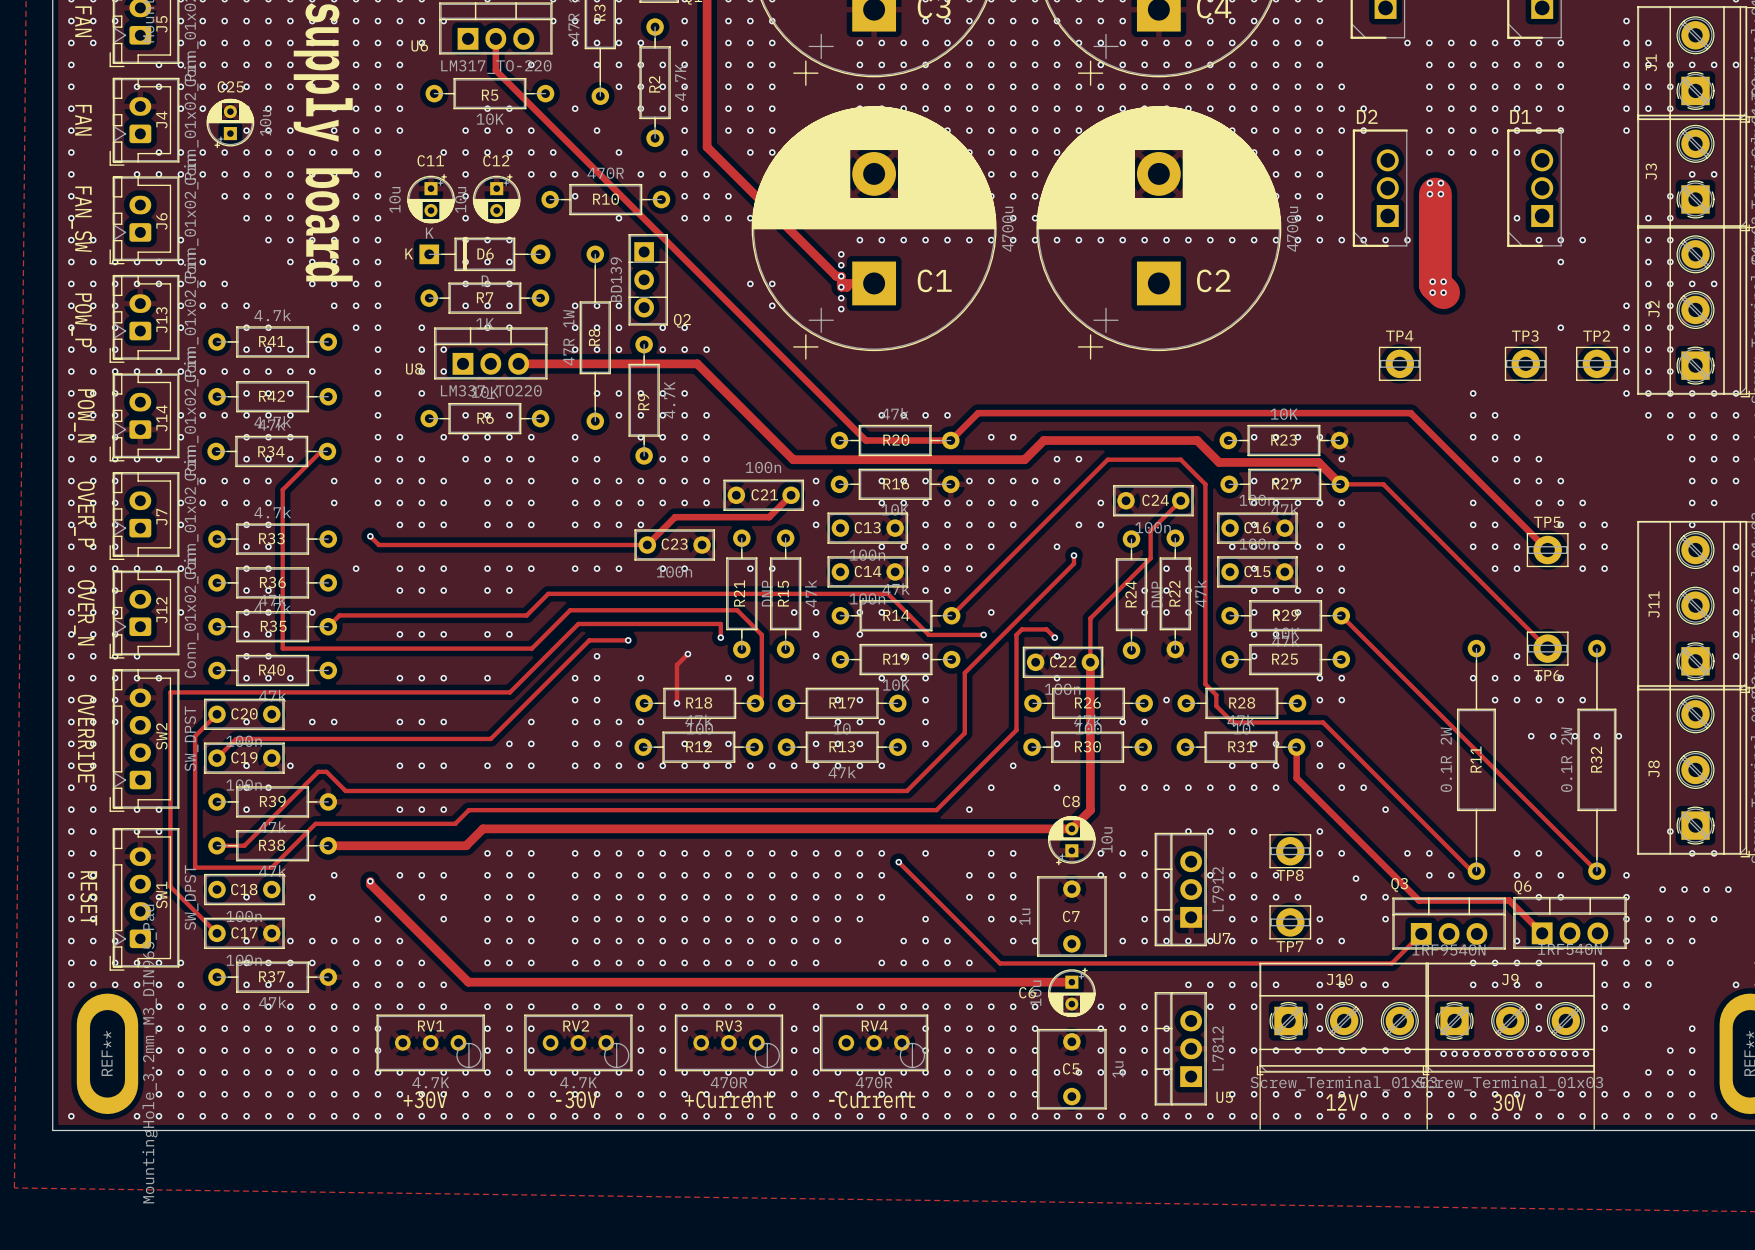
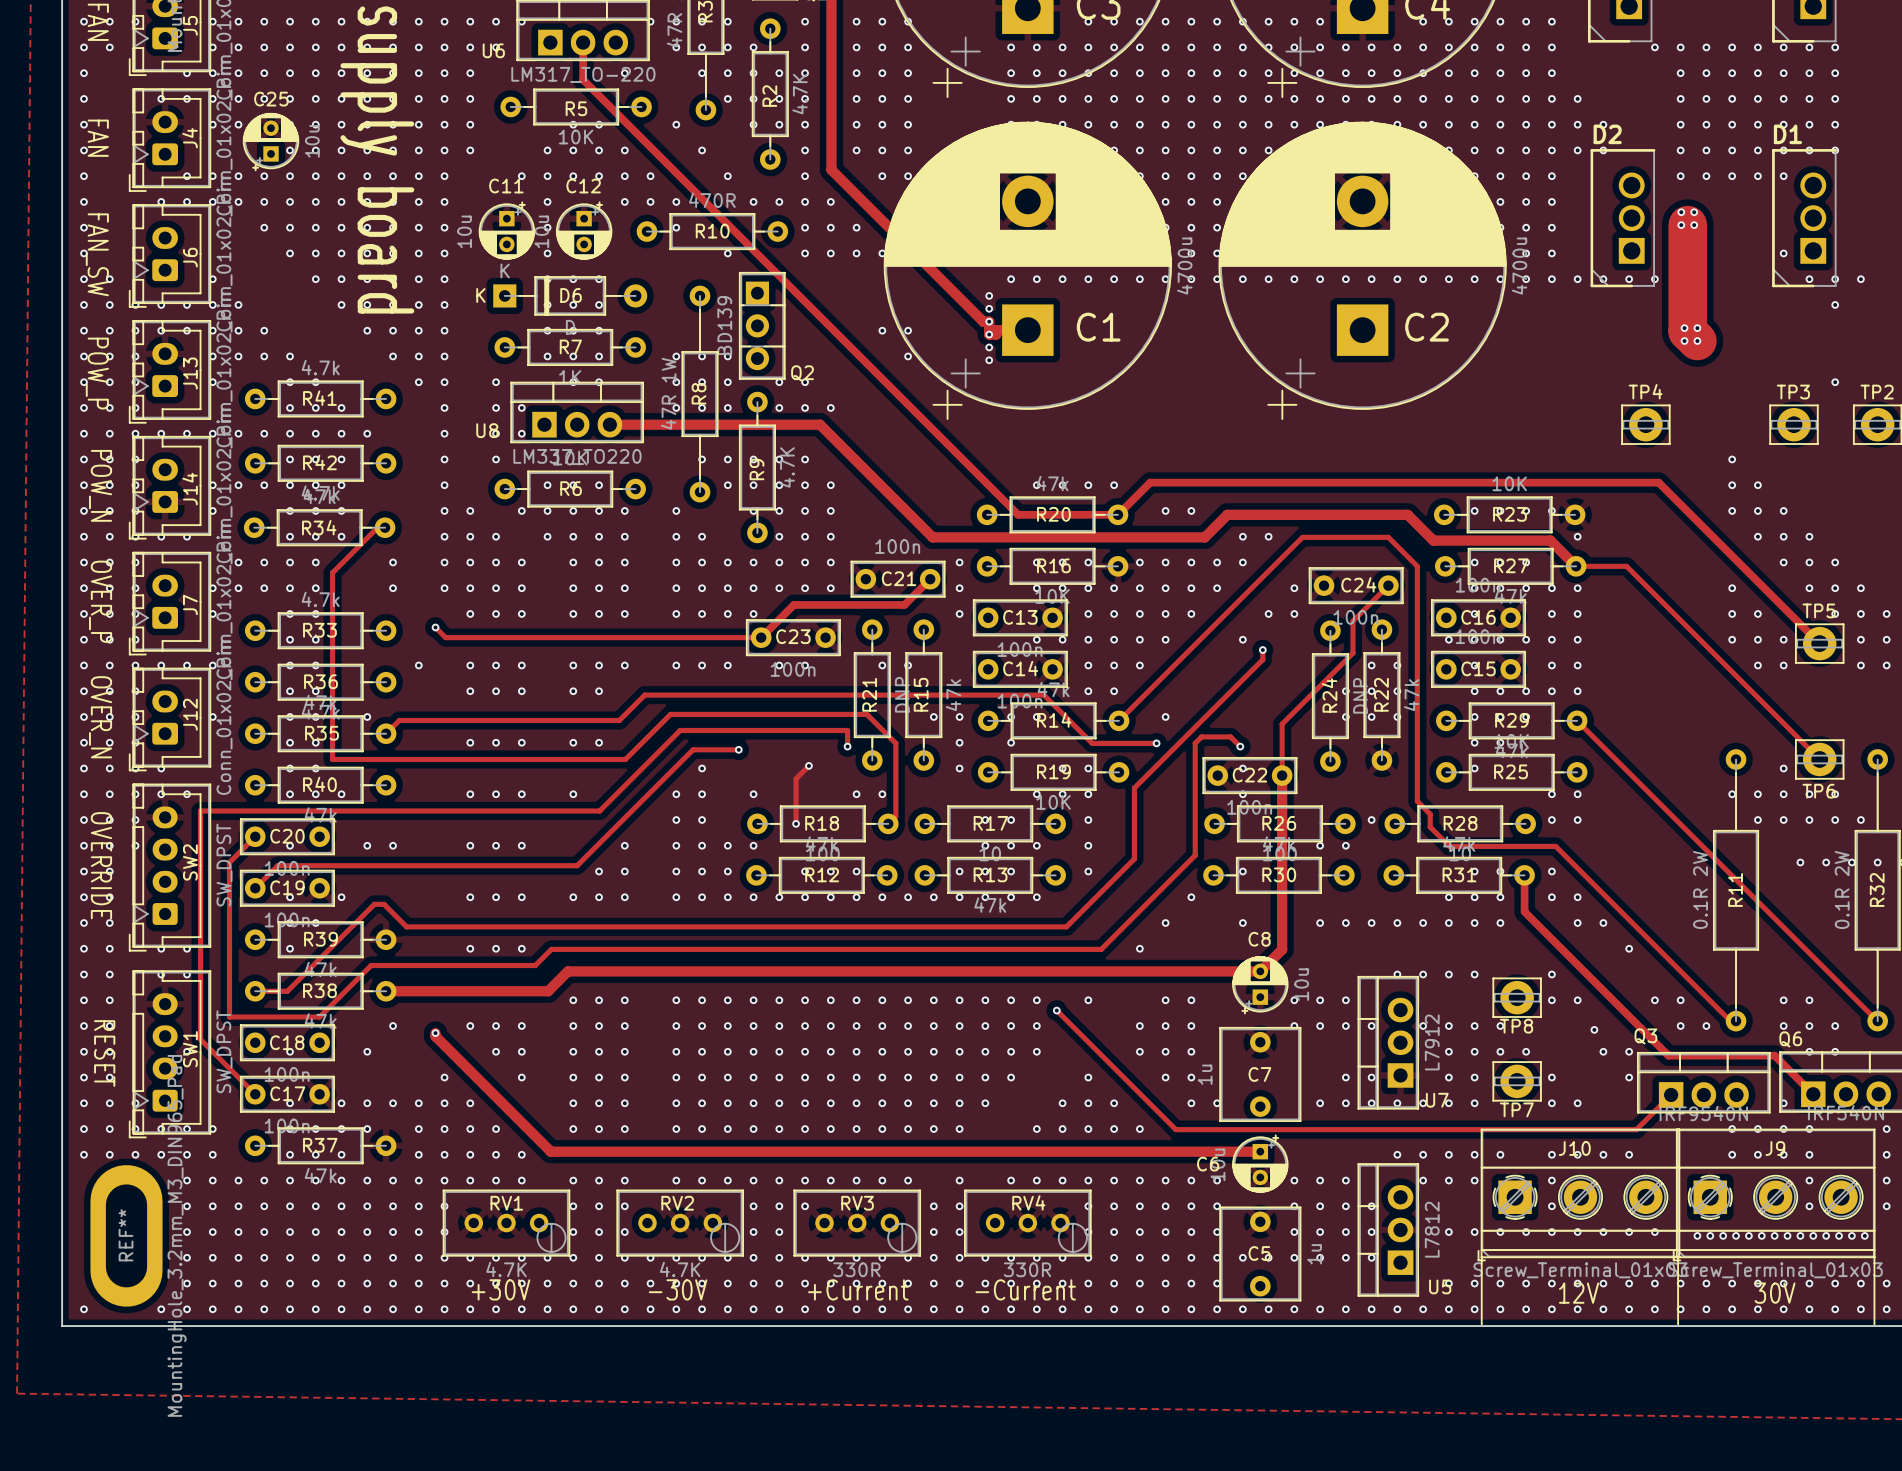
RV3 value: 470R (728, 1082) -> 330R (856, 1269)
RV4 value: 470R (873, 1082) -> 330R (1027, 1269)

